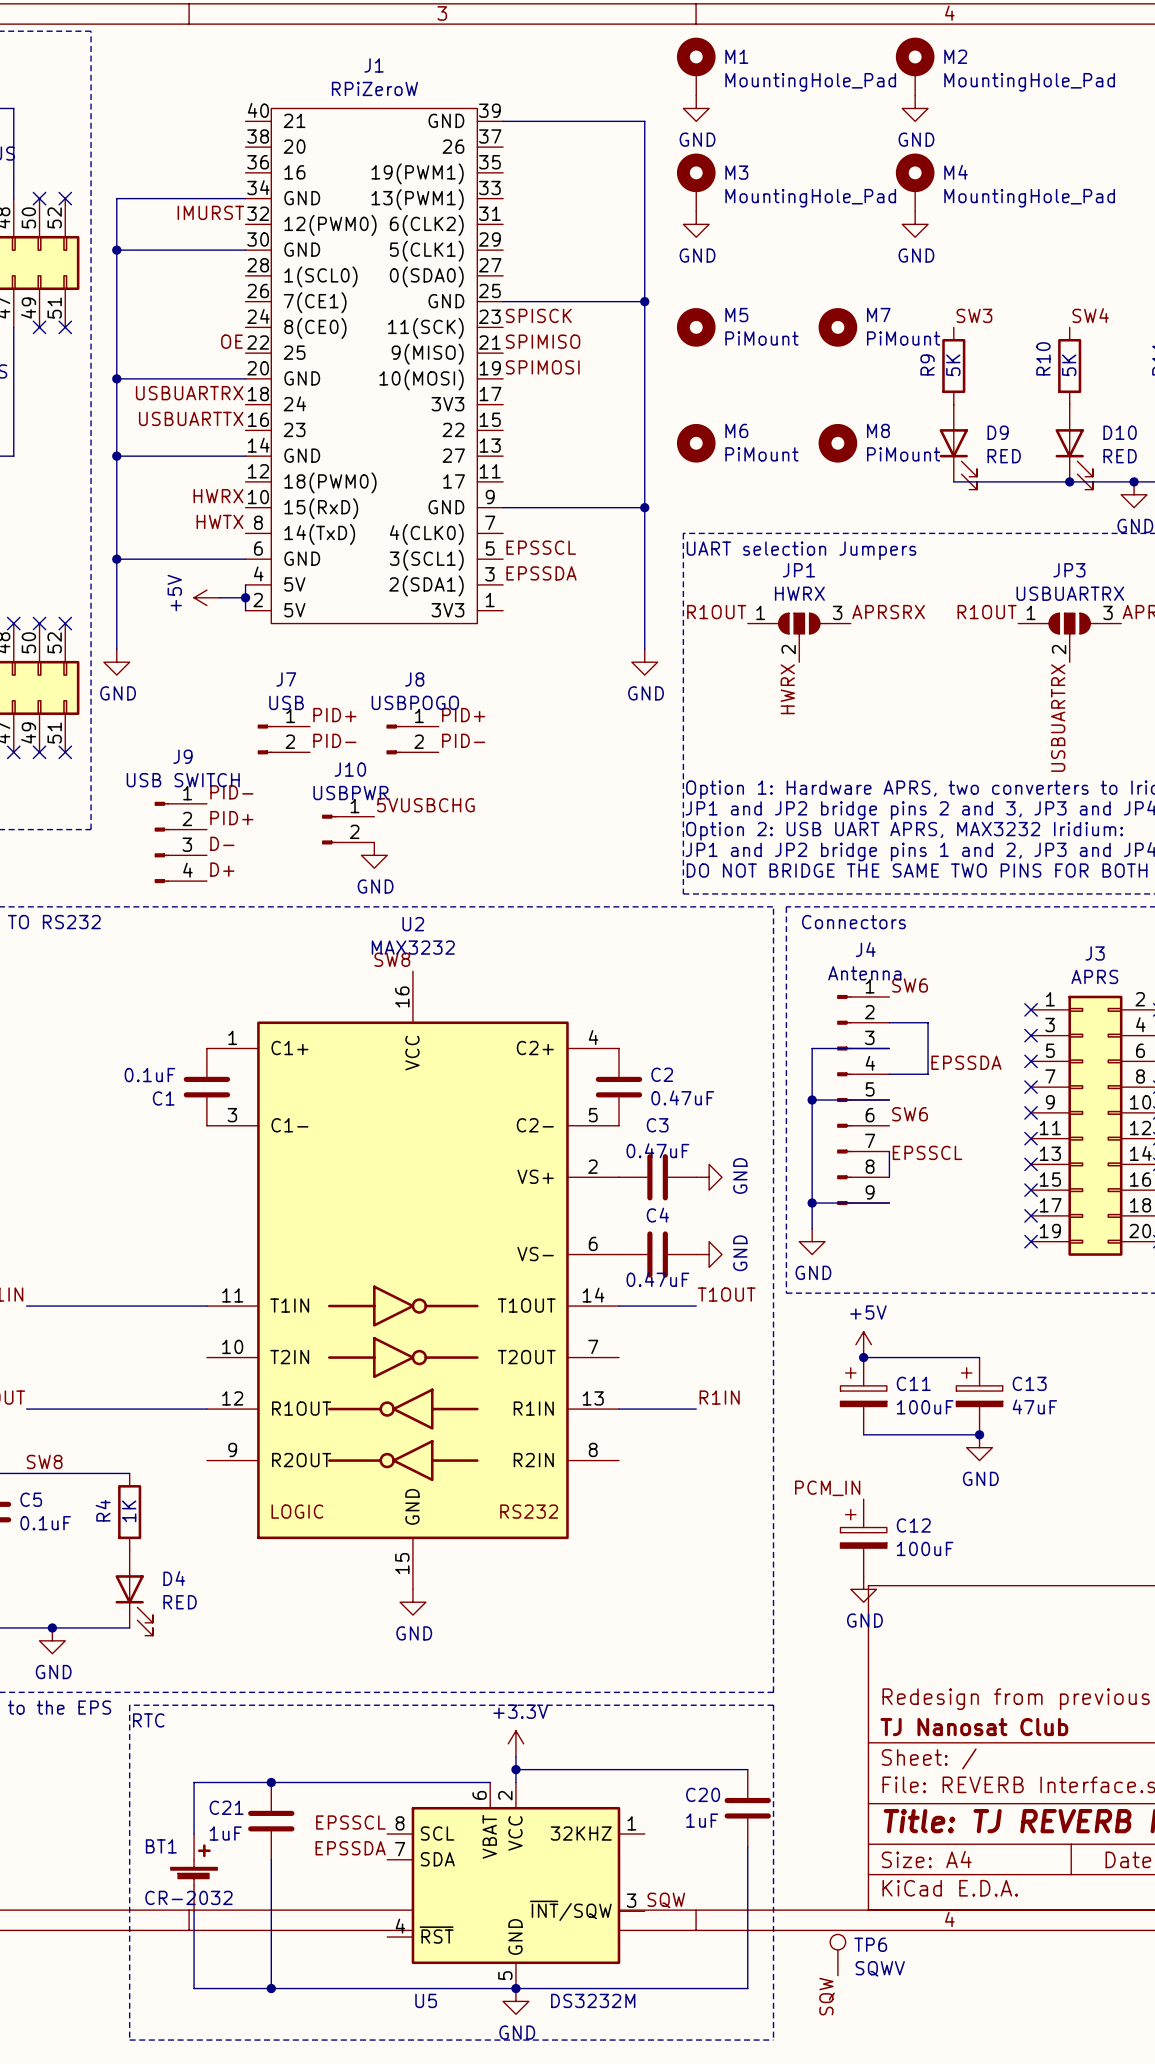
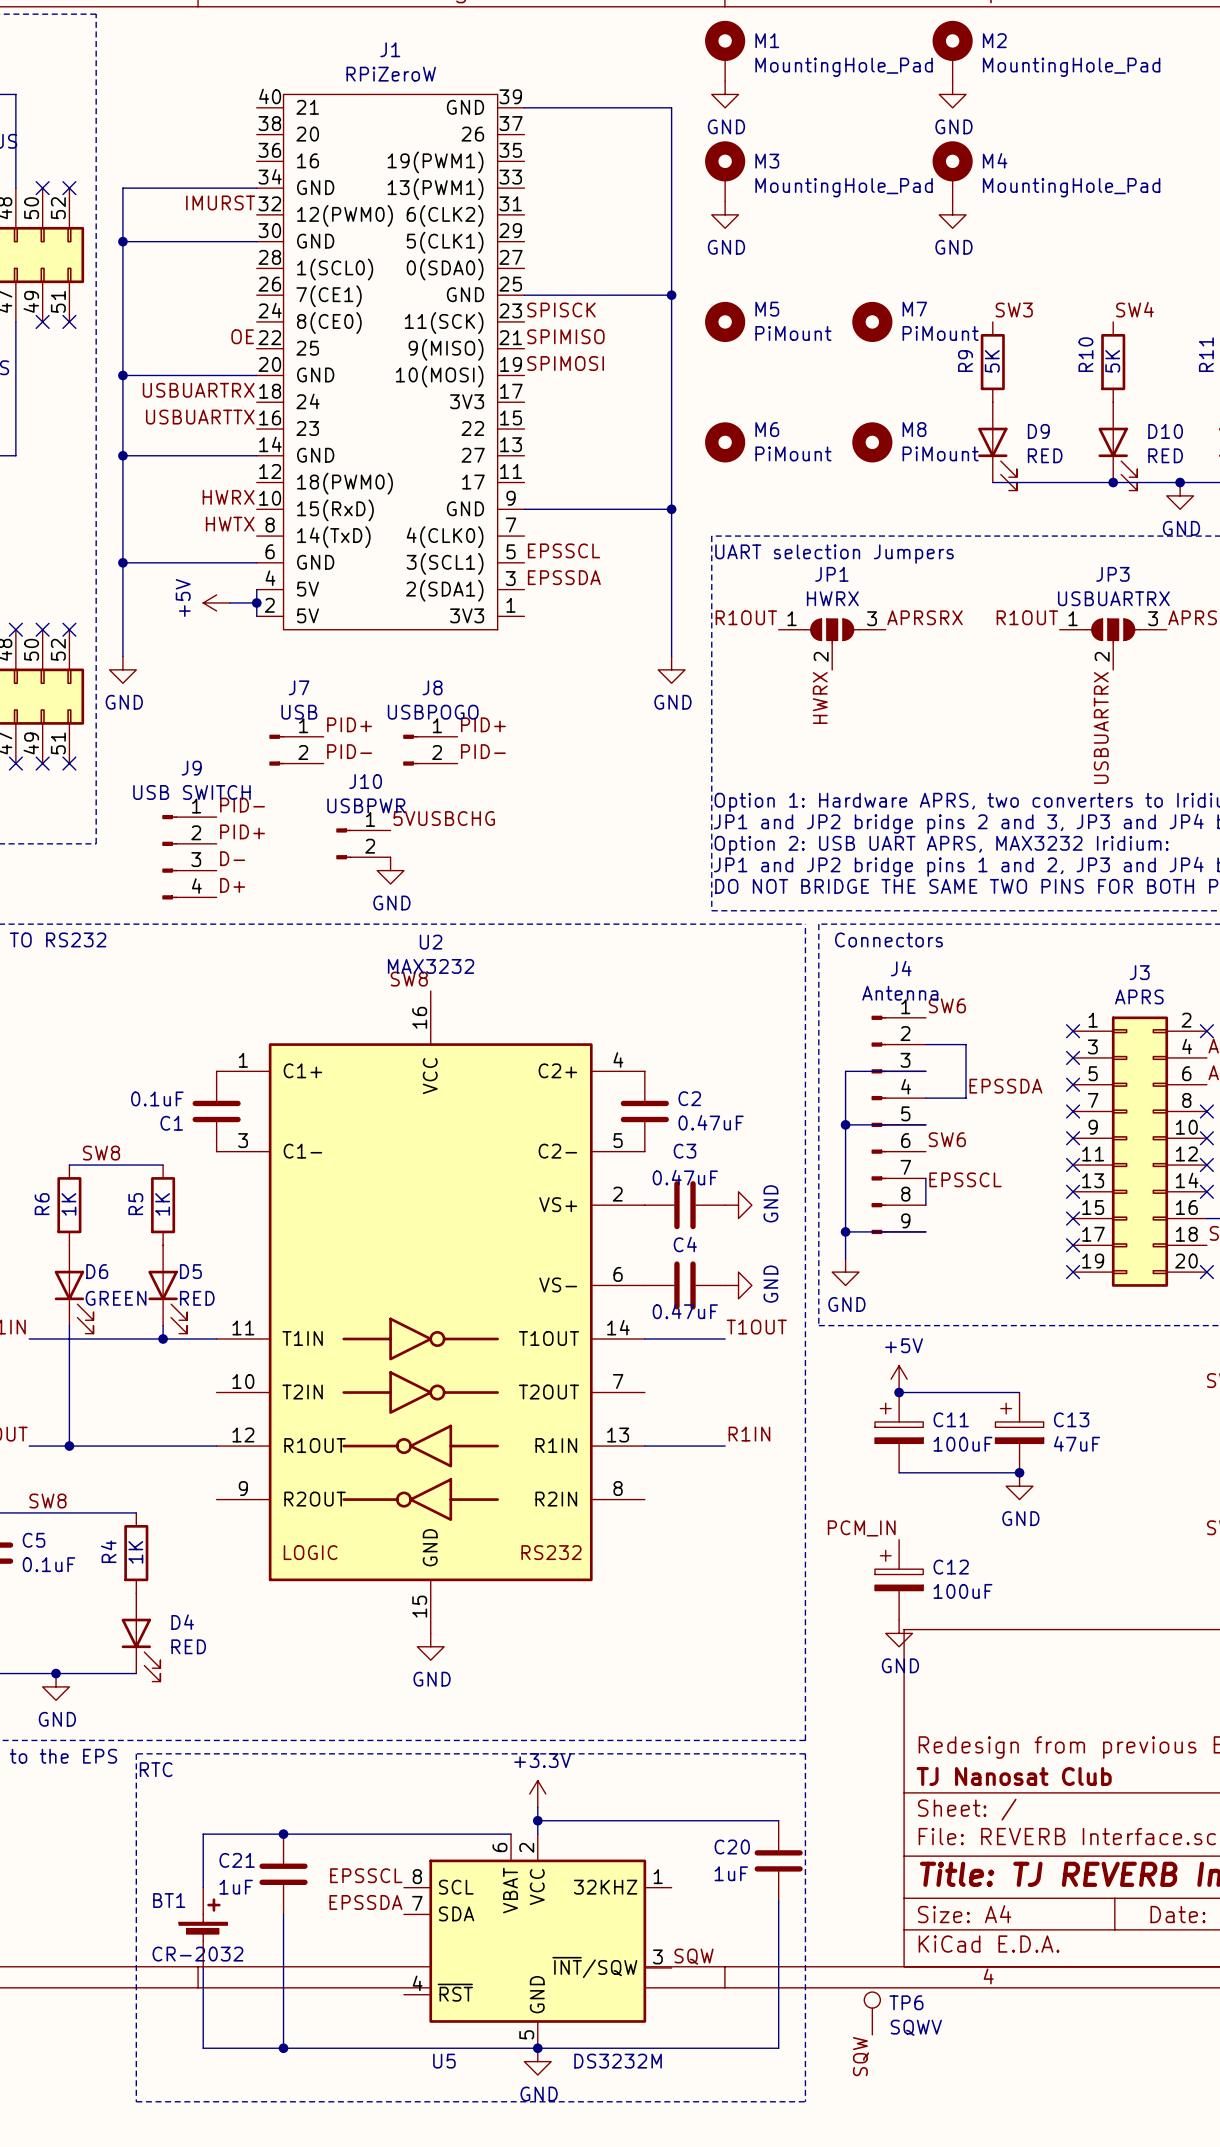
label: none -> SW8 (101, 1153)
wire: none -> (69, 1165) (163, 1165)
R6: none -> 1K (69, 1205)
R5: none -> 1K (163, 1205)
D6: none -> GREEN (74, 1289)
D5: none -> RED (167, 1289)
wire: none -> (69, 1325) (69, 1446)
wire: none -> (163, 1325) (163, 1338)
junction: none -> (163, 1338)
junction: none -> (69, 1446)

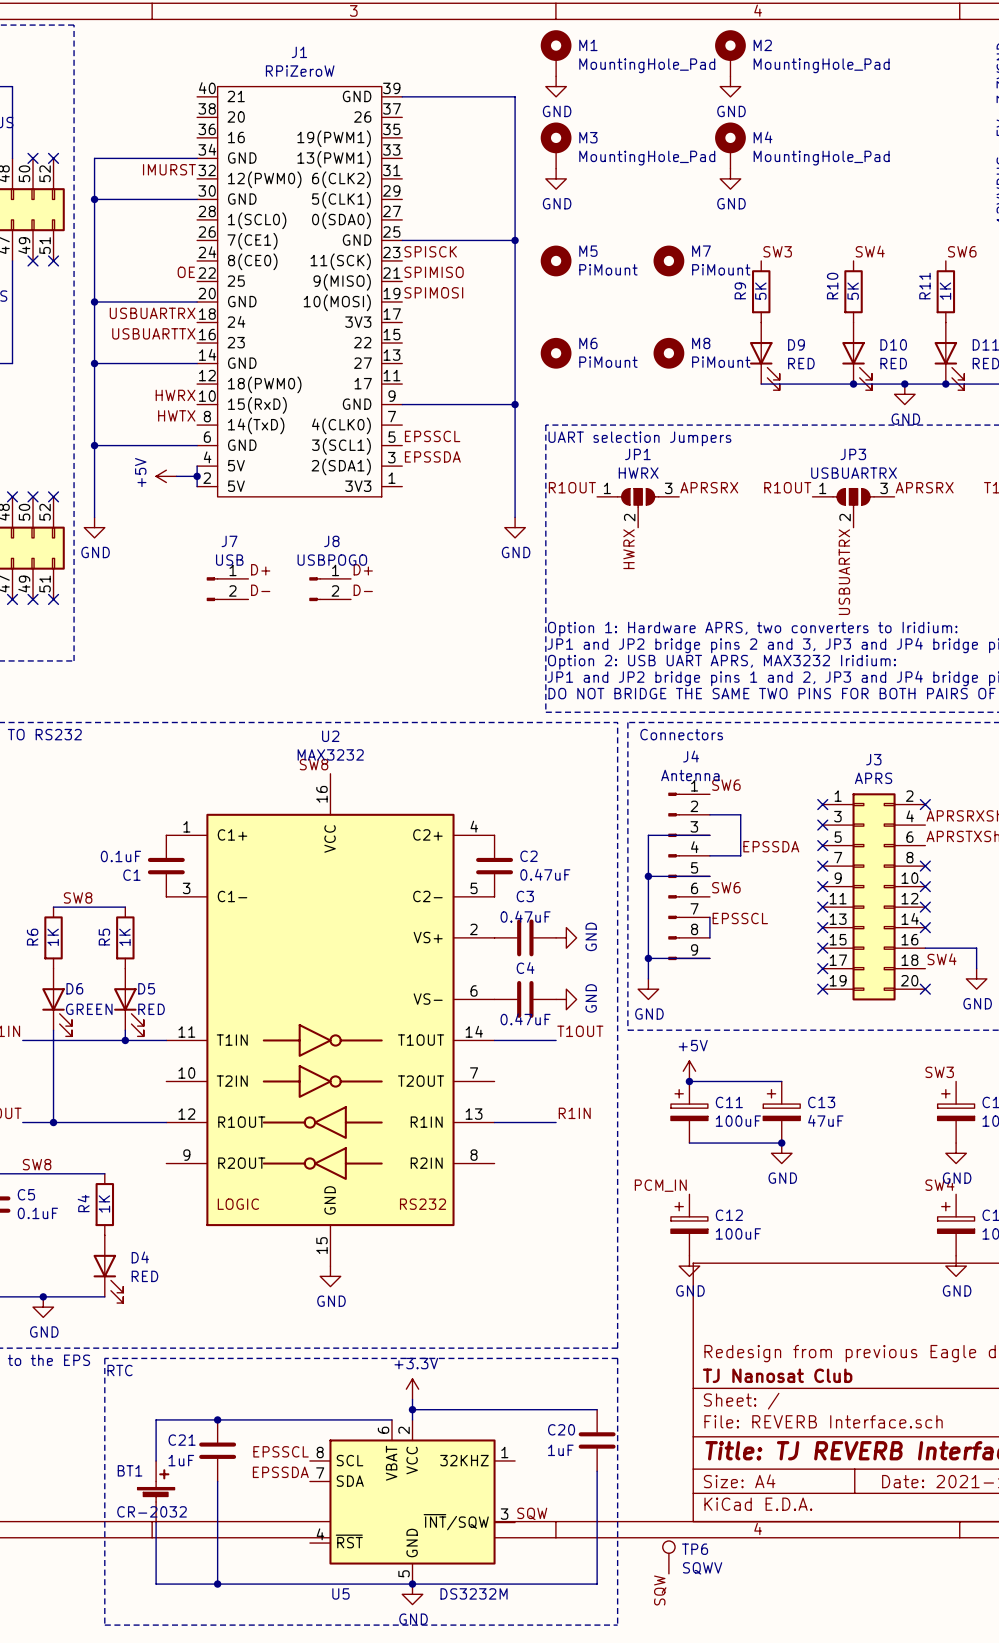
label: PID+ (349, 724) -> D+ (260, 569)
label: PID+ (483, 724) -> D+ (363, 569)
label: PID- (349, 751) -> D- (260, 590)
label: PID- (483, 751) -> D- (363, 590)
label: PID- (242, 805) -> none
label: 5VUSBCHG (444, 818) -> none
label: PID+ (242, 831) -> none
J10: USBPWR (363, 843) -> none
J9: USB SWITCH (189, 857) -> none
label: D- (232, 858) -> none
power symbol: GND (390, 870) -> none
label: D+ (232, 885) -> none

